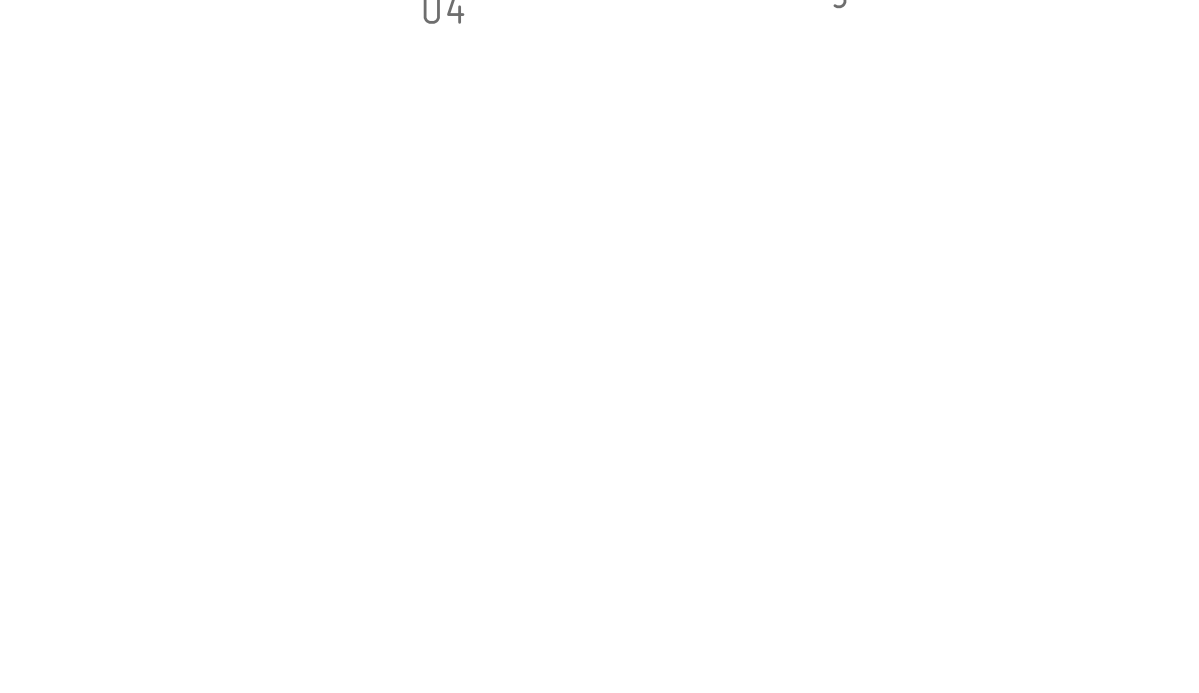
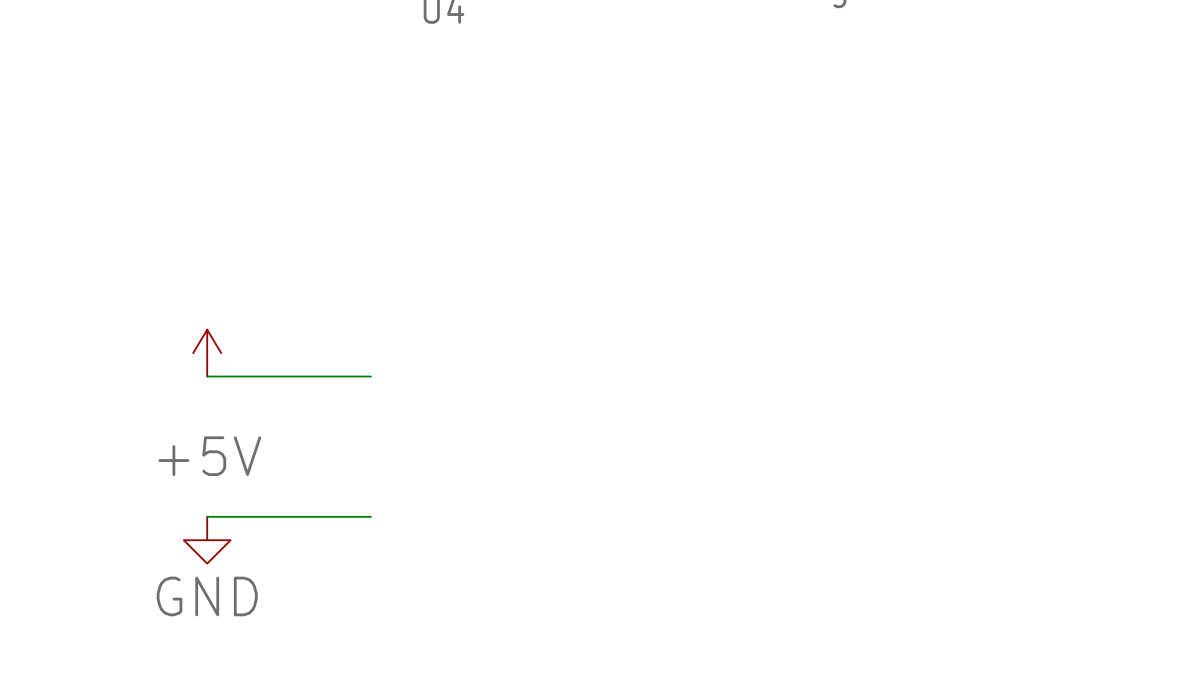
power symbol: none -> +5V (207, 353)
wire: none -> (207, 376) (370, 376)
wire: none -> (207, 516) (370, 516)
power symbol: none -> GND (207, 540)

